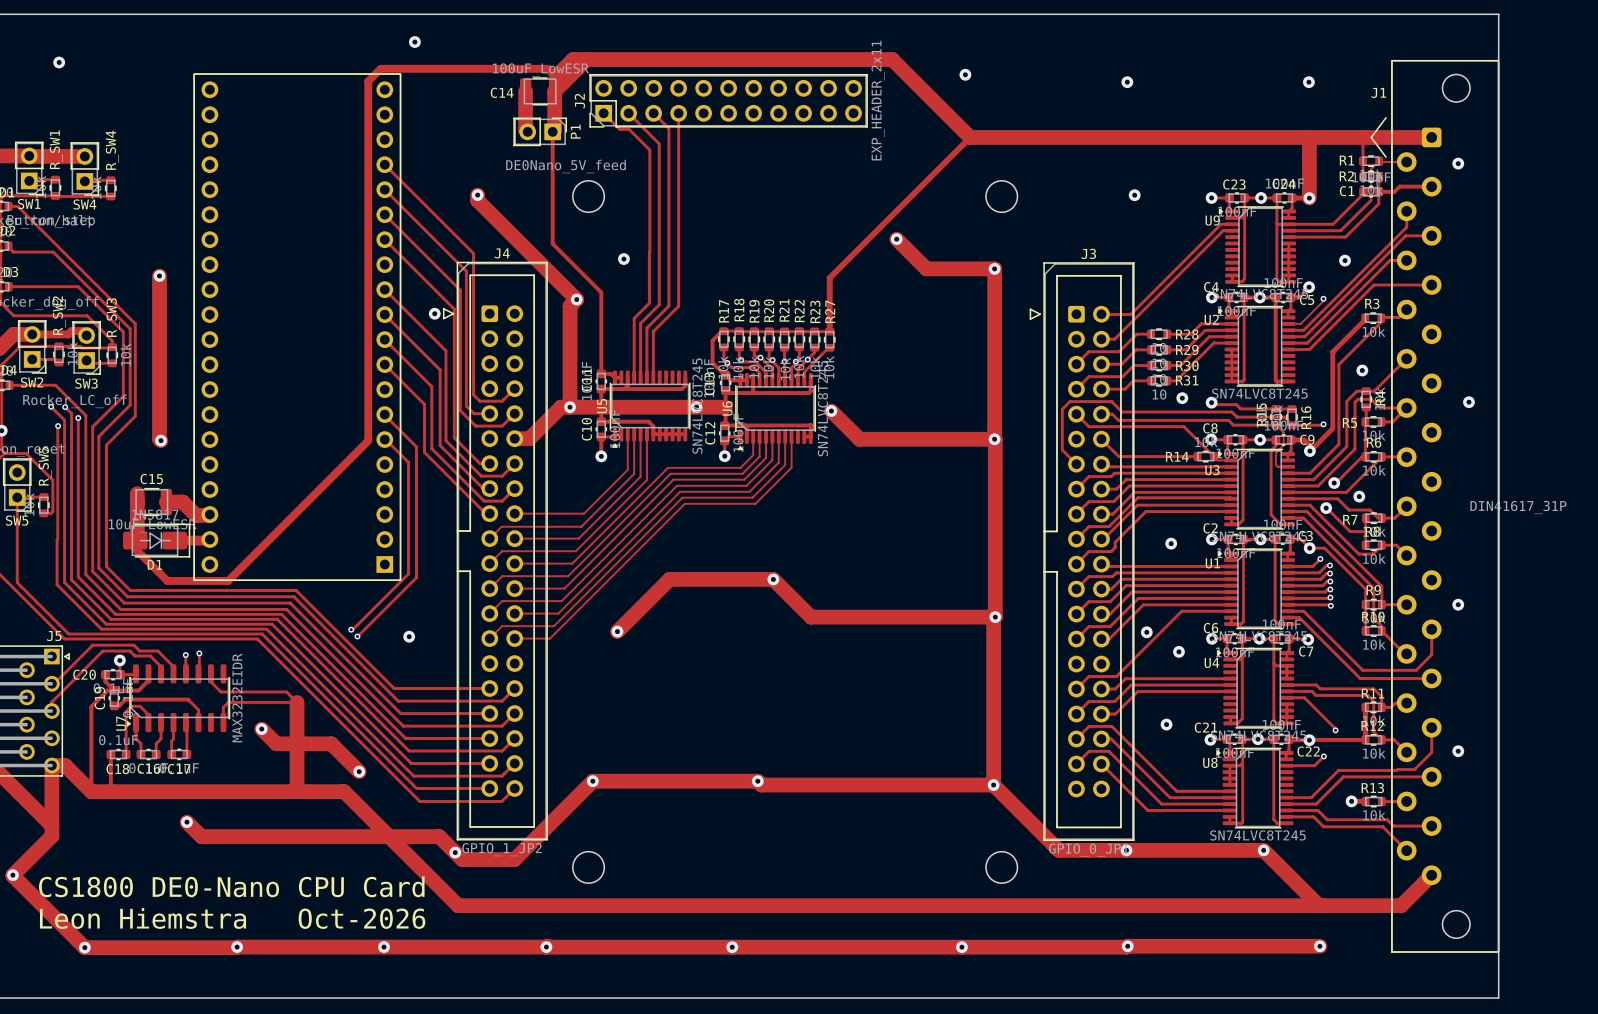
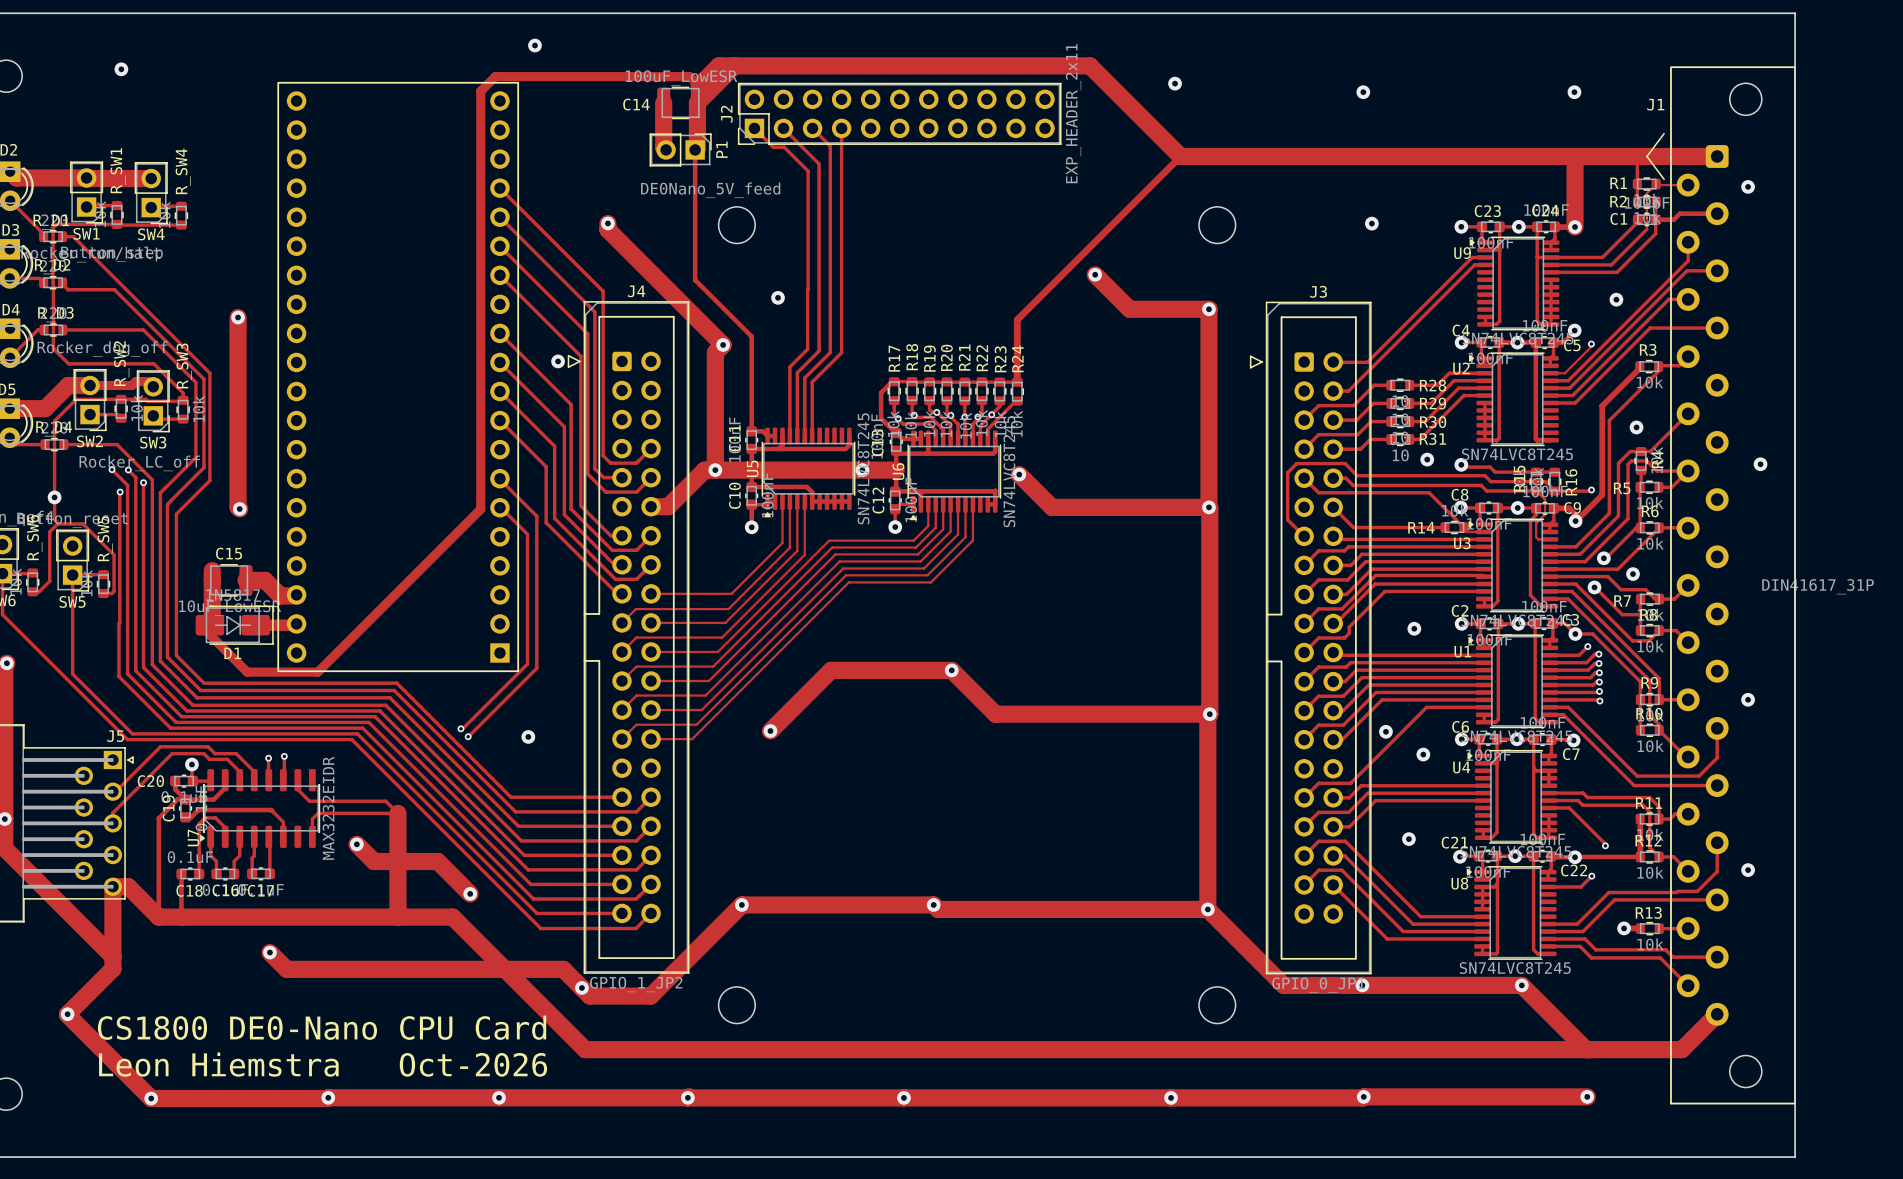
R27 name: R27 (830, 311) -> R24 (1017, 358)

